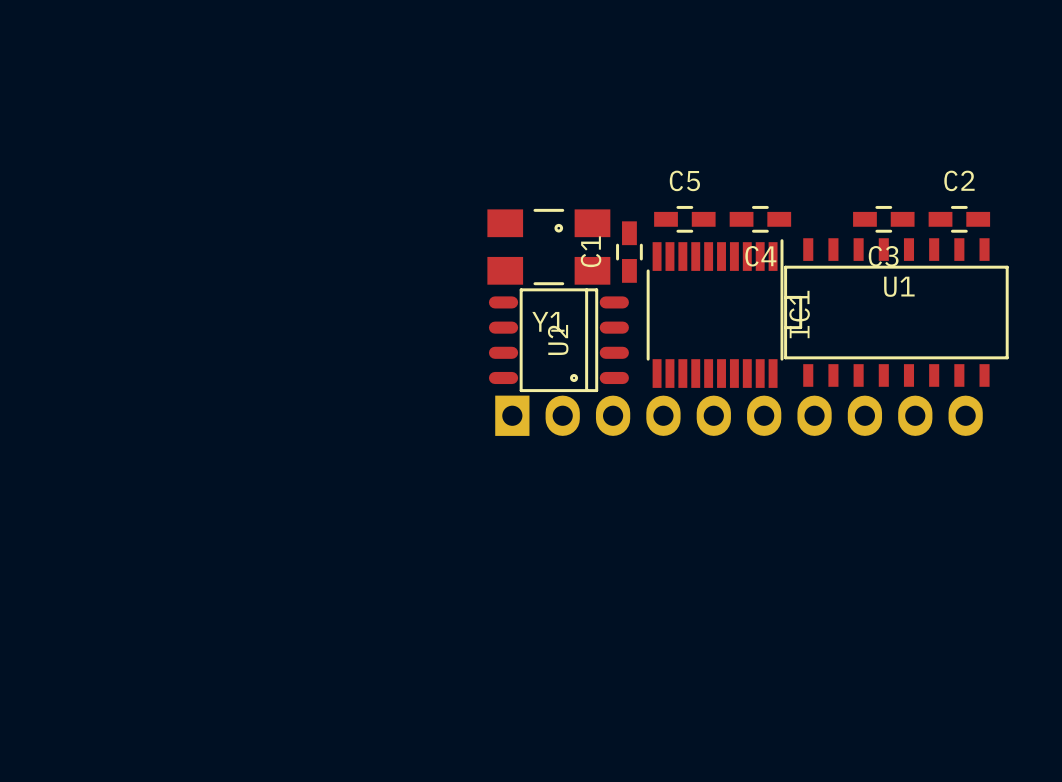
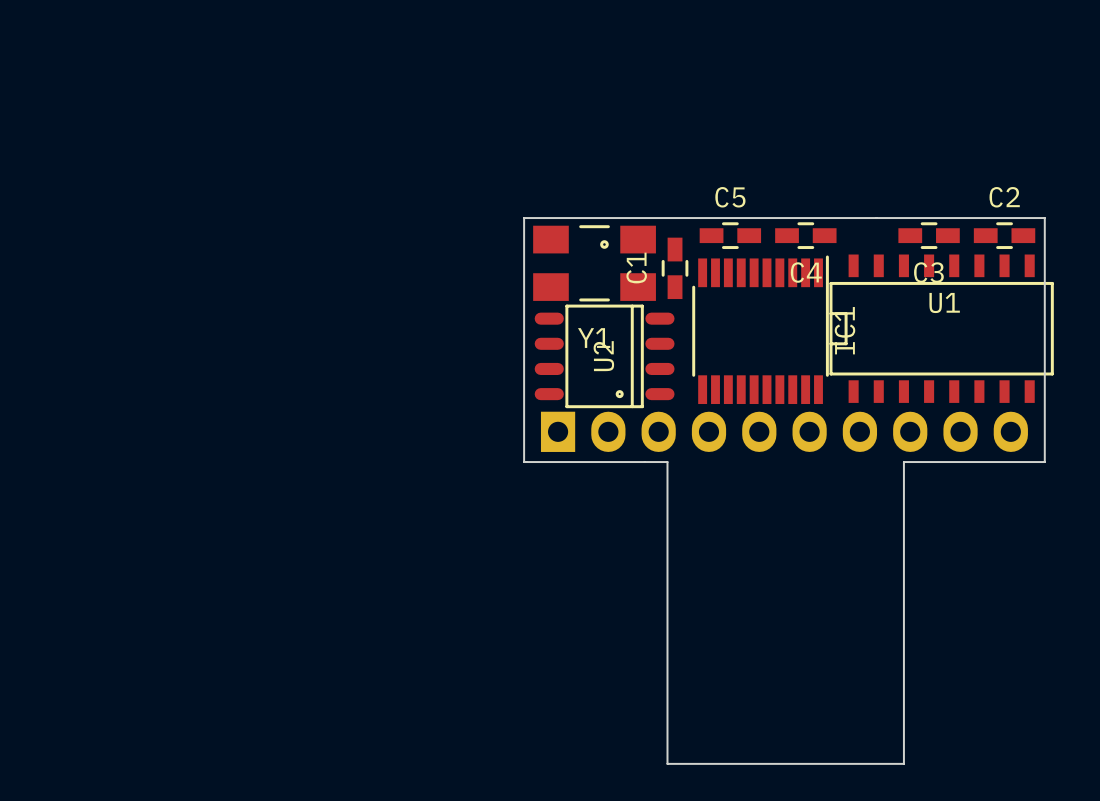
board edge: none -> (524, 218) (524, 462) (667, 462) (667, 763) (903, 763) (903, 462) (1044, 462) (1044, 218) (524, 218)

